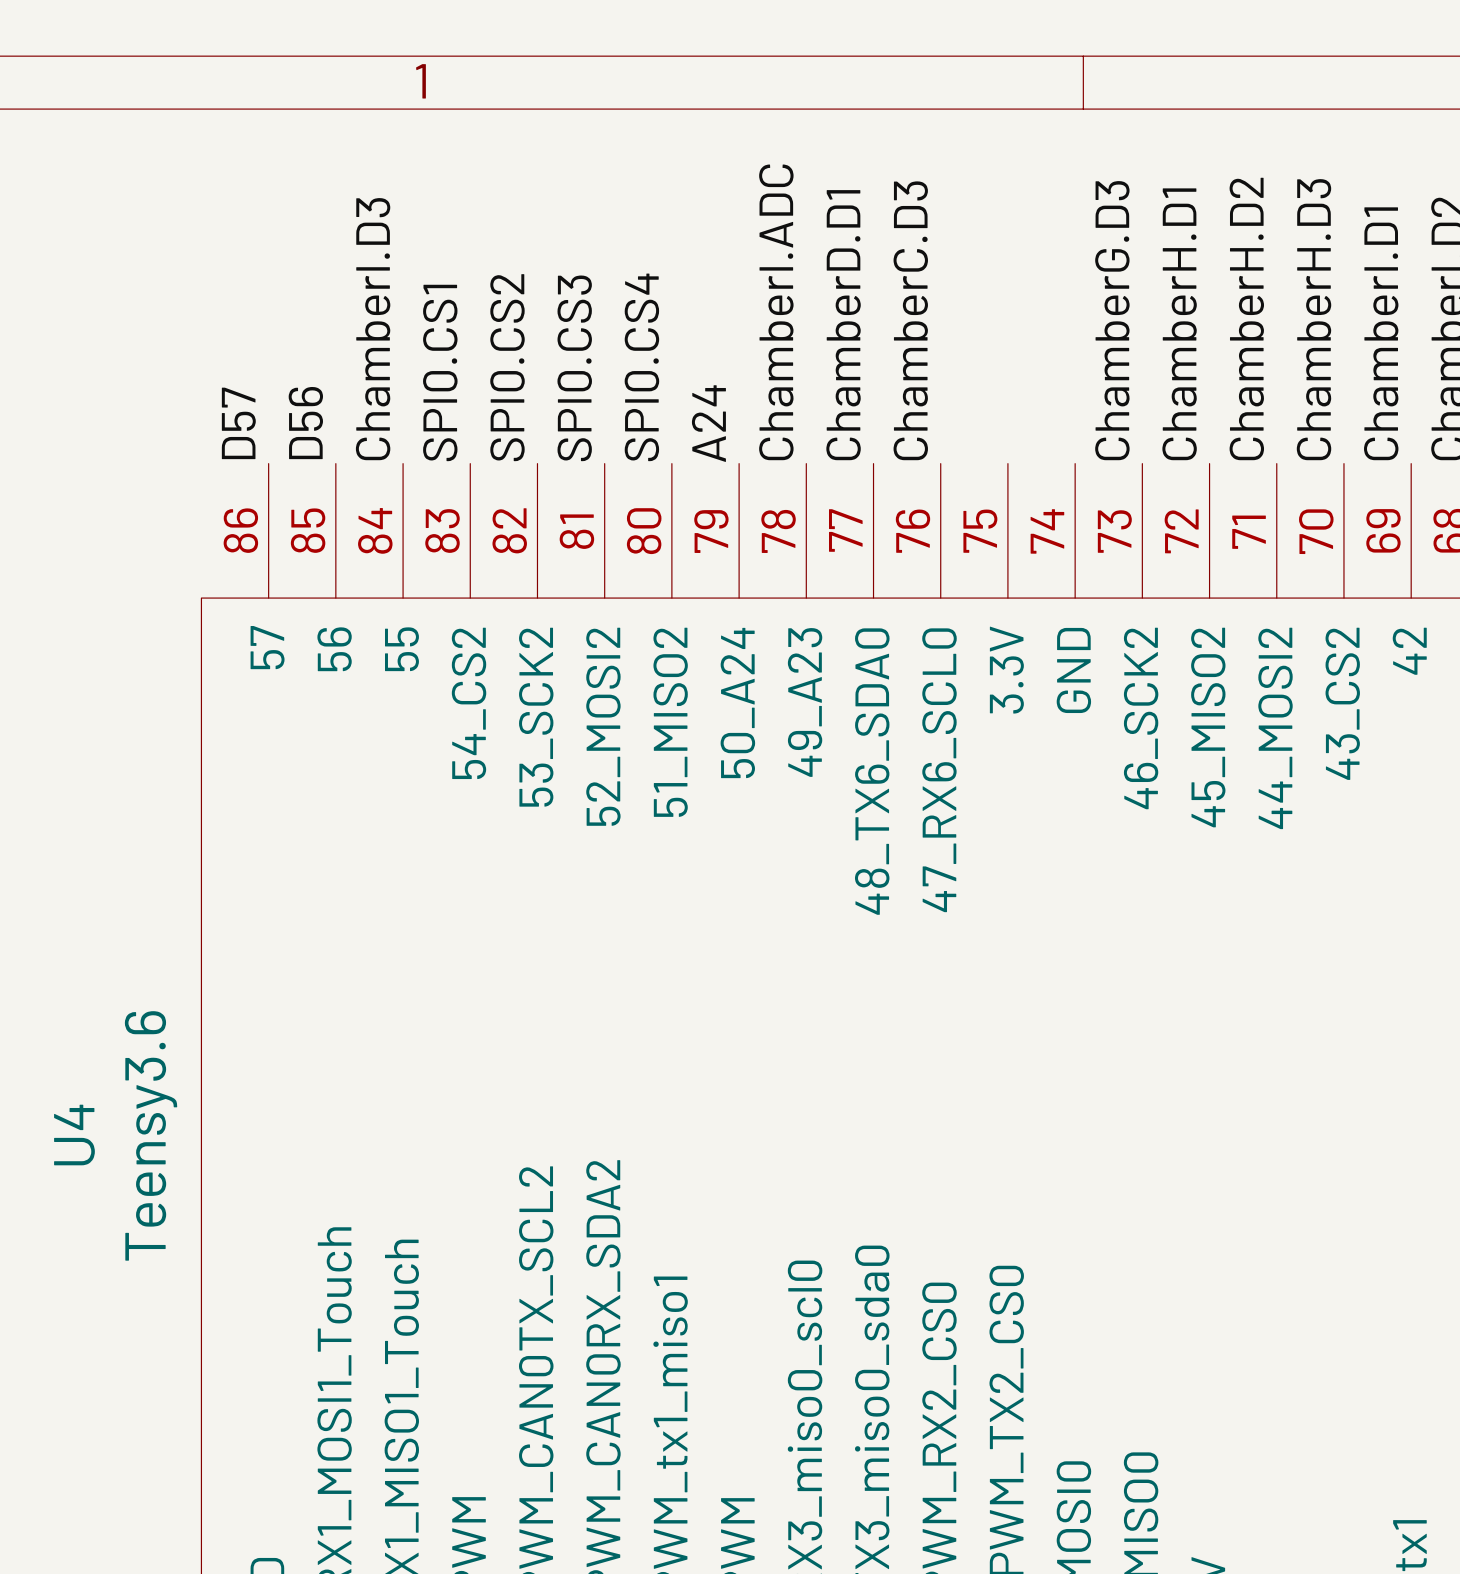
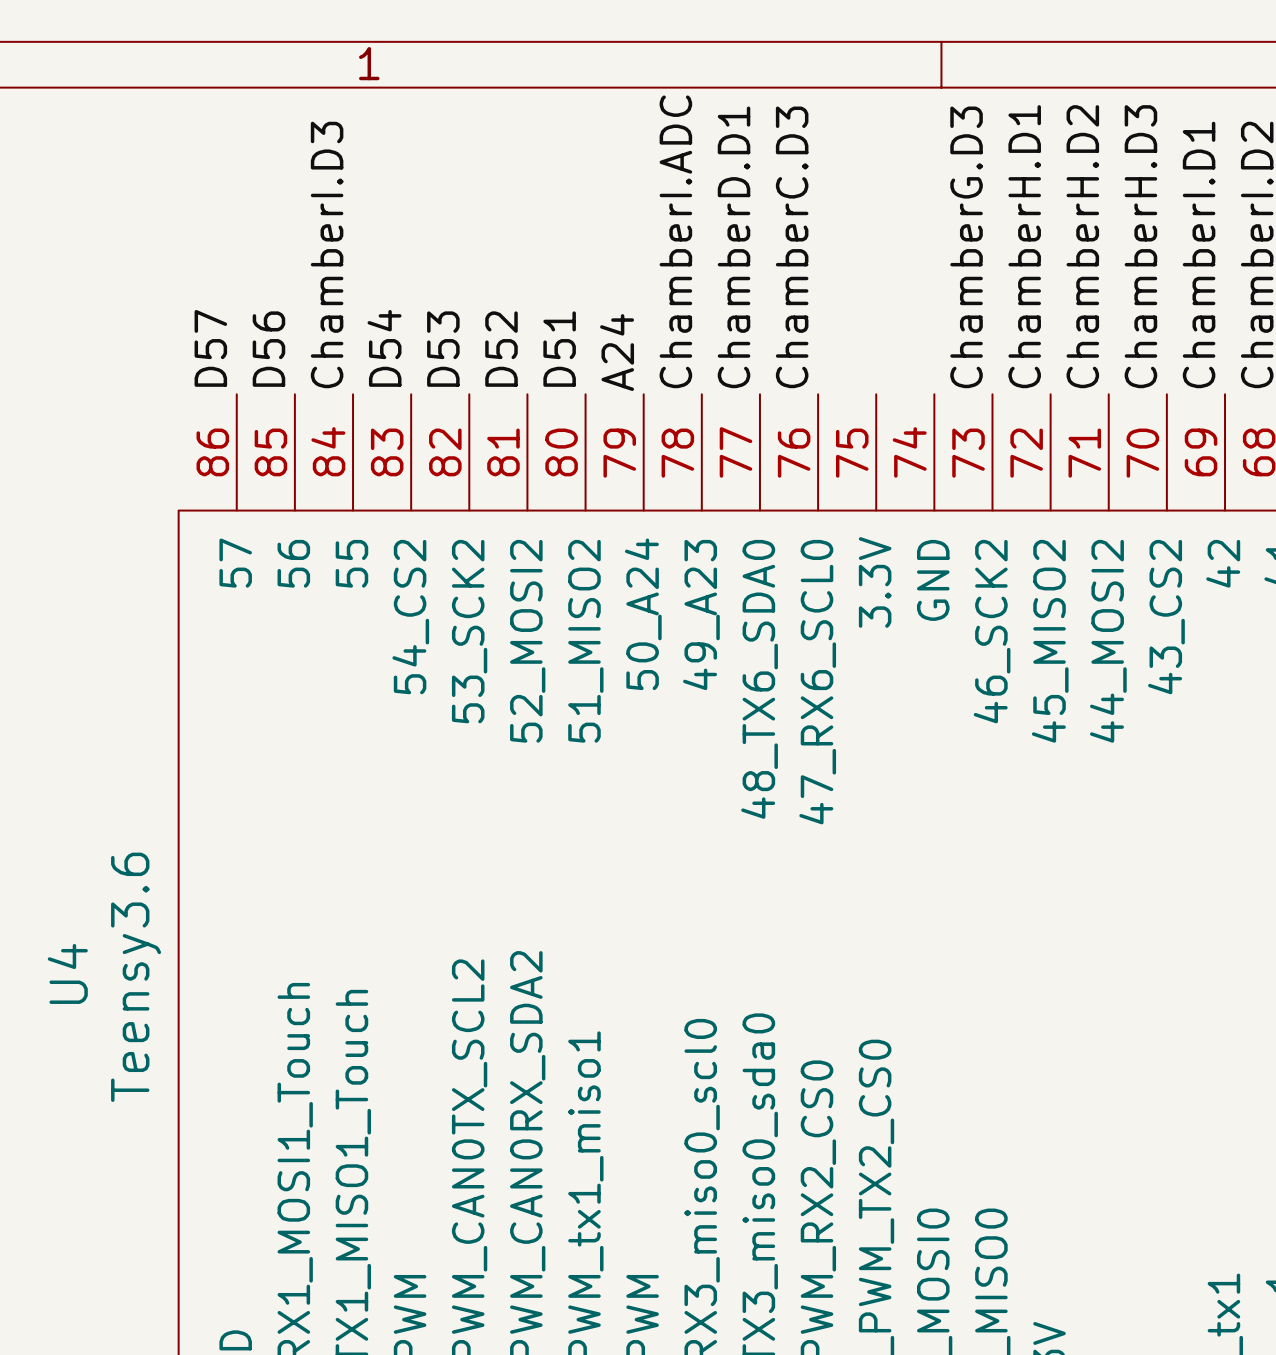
label: SPI0.CS2 (507, 367) -> D53 (443, 349)
label: SPI0.CS4 (641, 367) -> D51 (559, 349)
label: SPI0.CS3 (574, 368) -> D52 (501, 349)
label: SPI0.CS1 (440, 372) -> D54 (384, 348)

